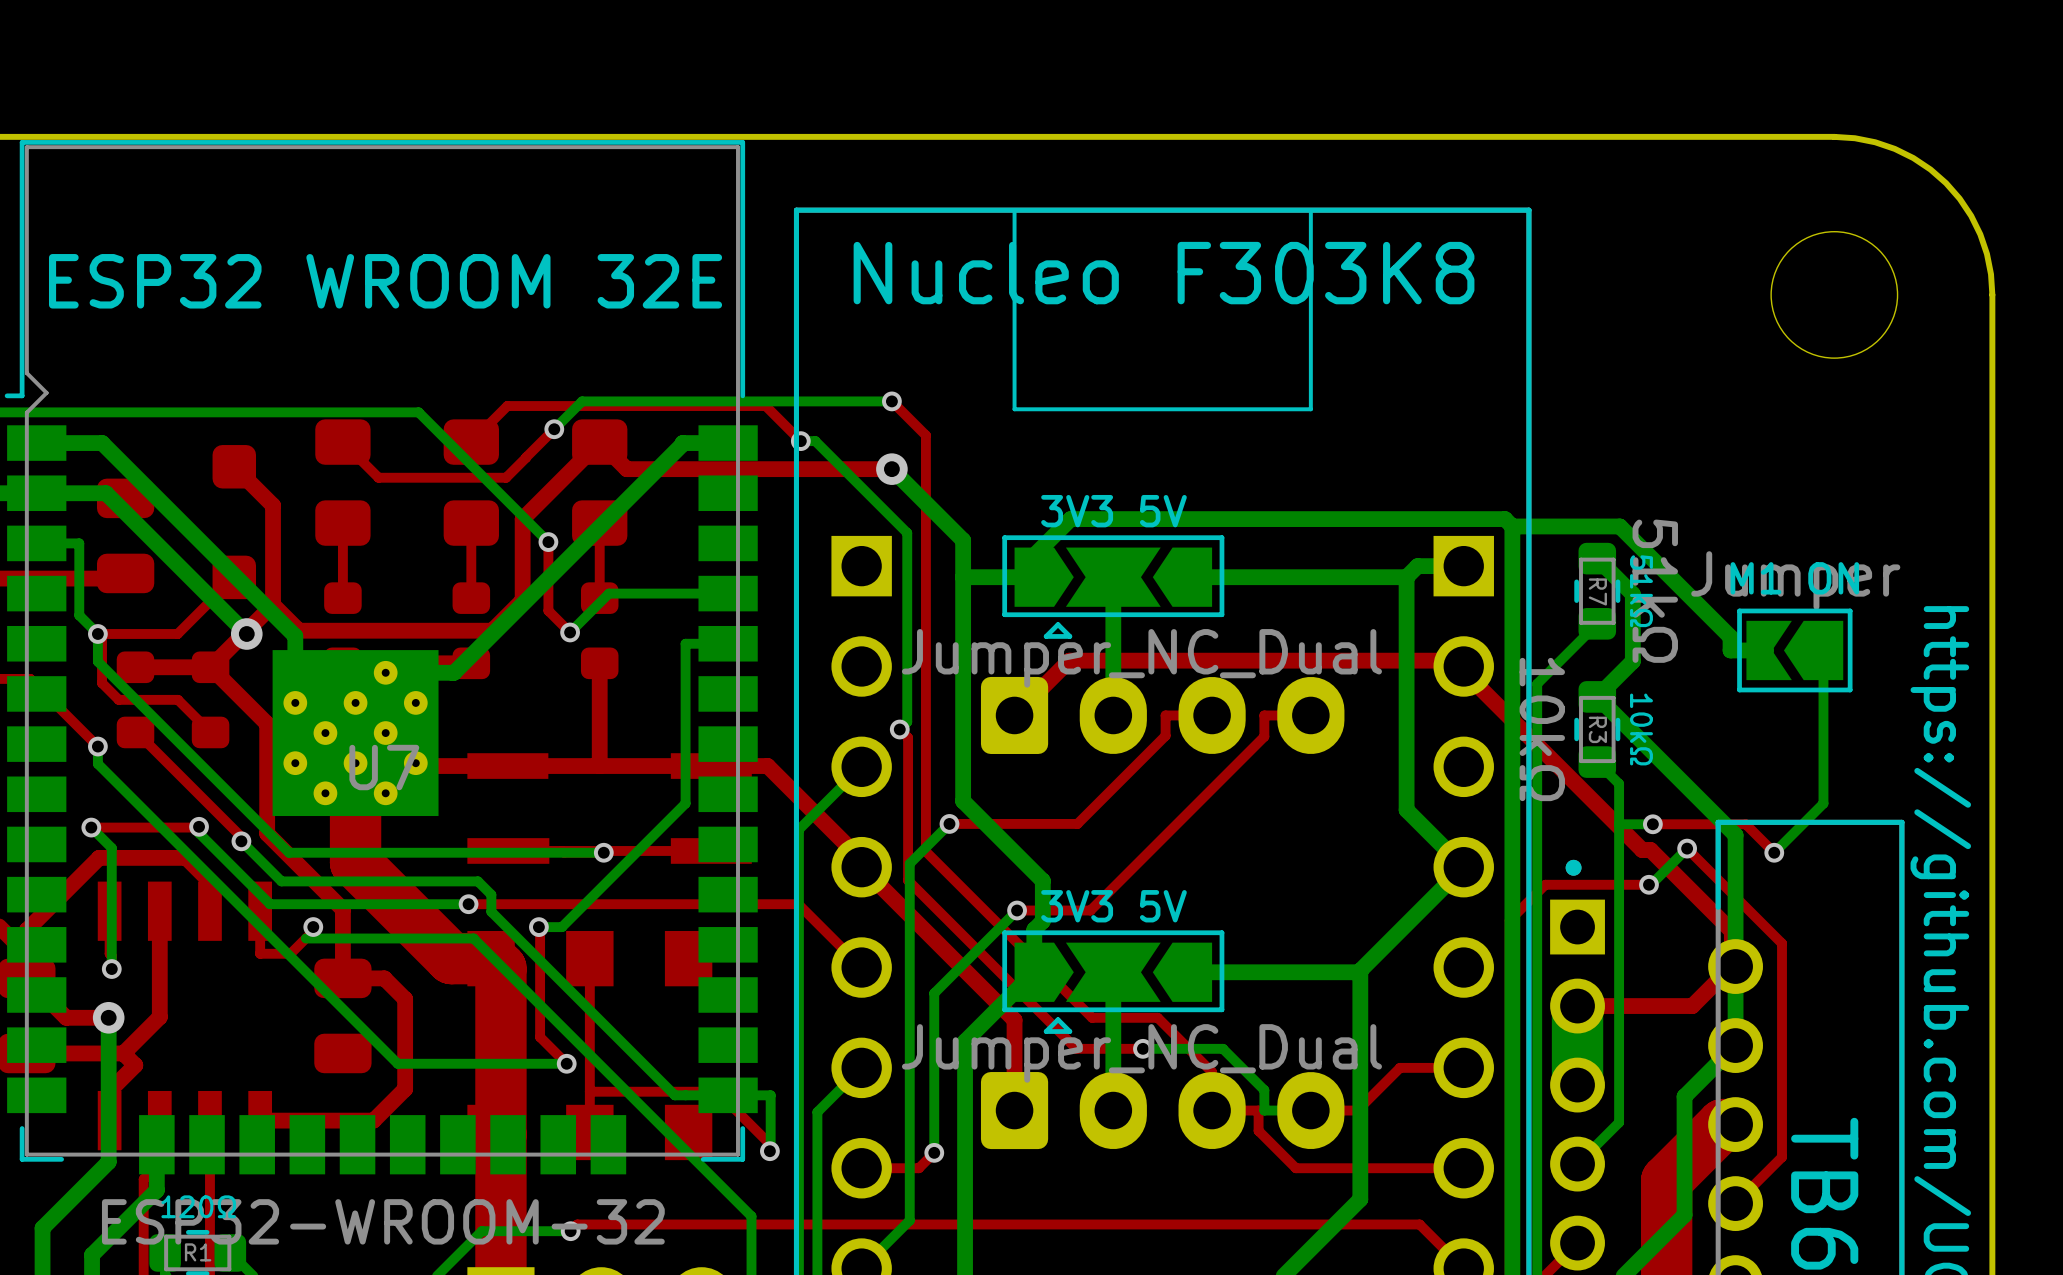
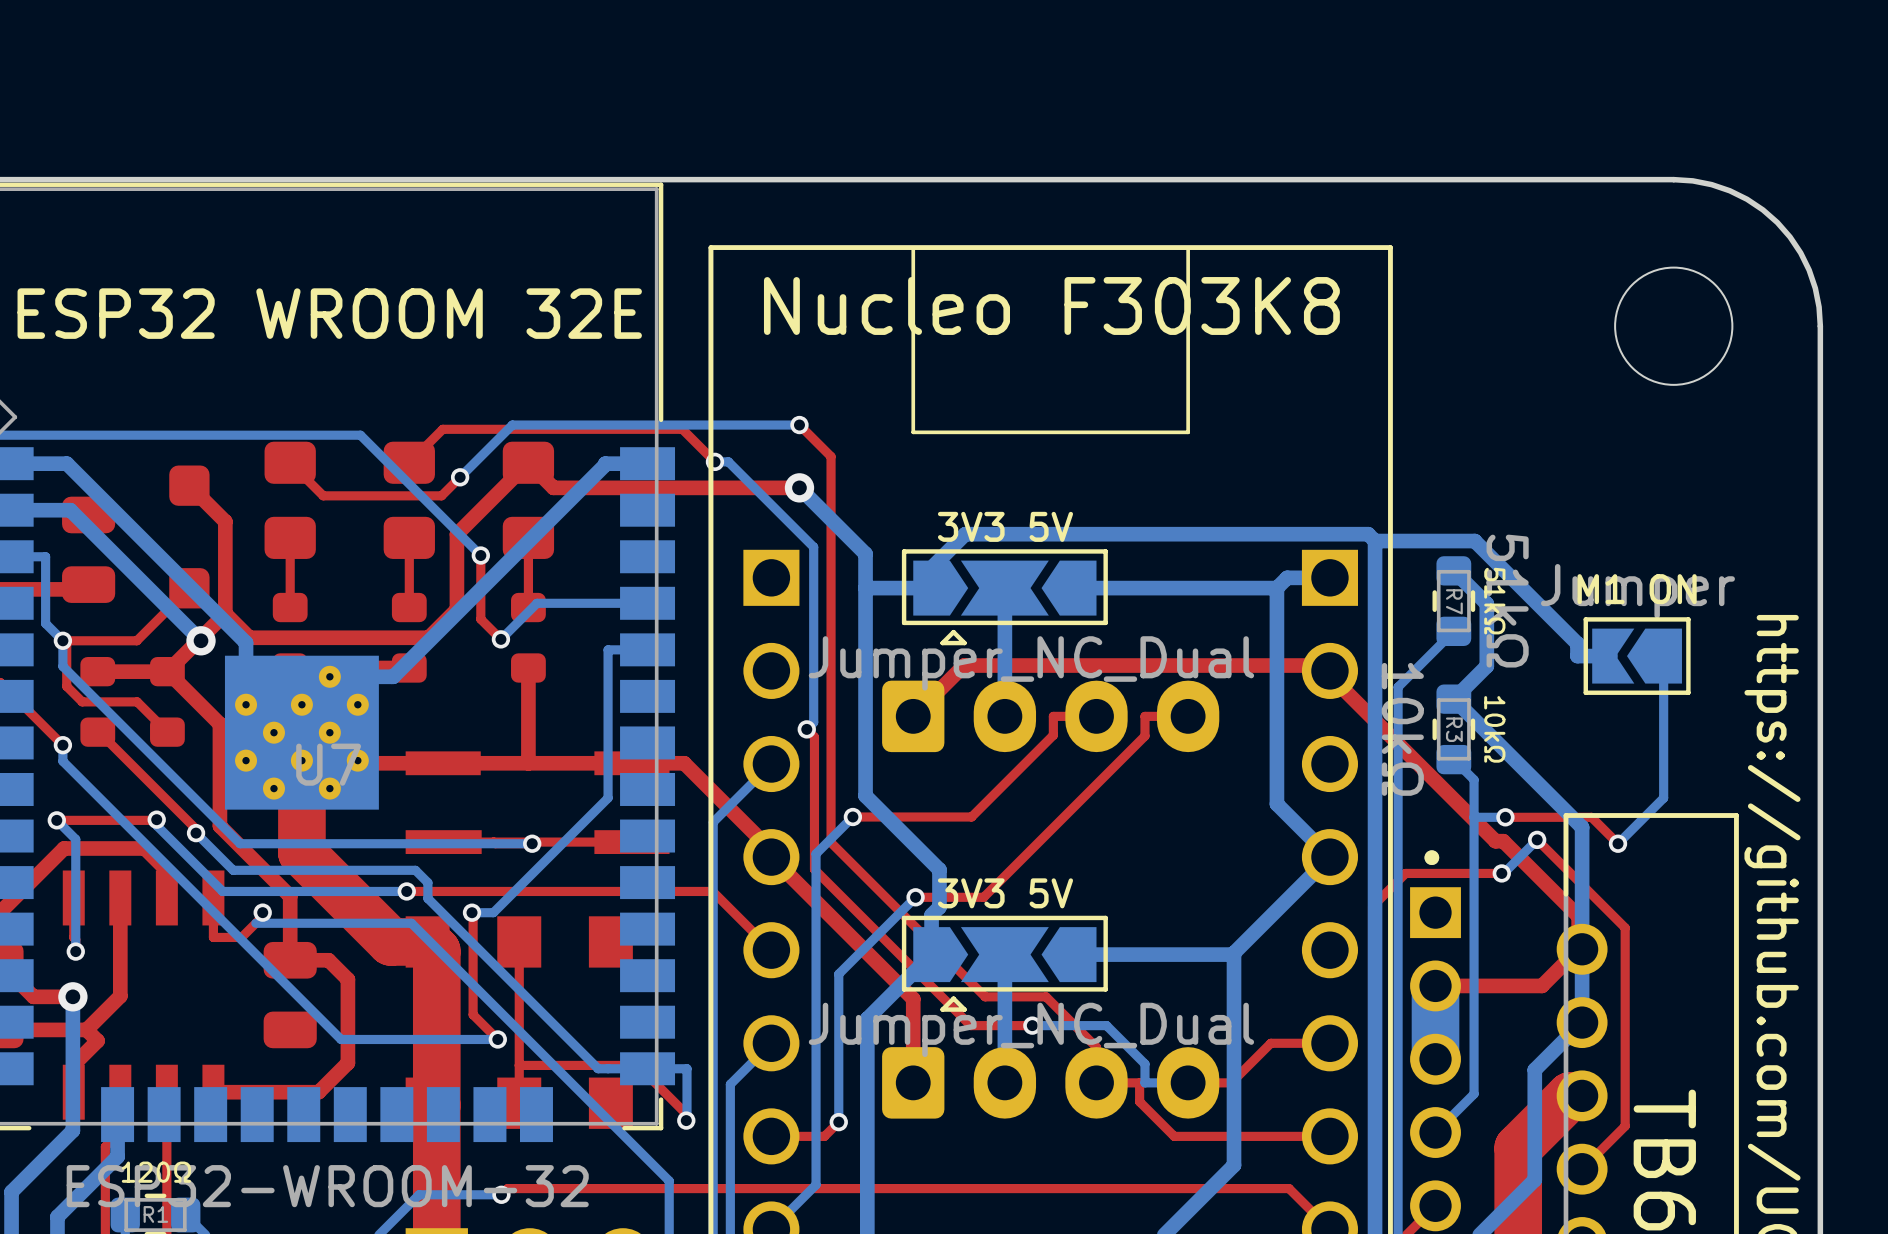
bottom track: (582, 401) (554, 429) -> (512, 425) (460, 477)
top track: (554, 429) (526, 457) -> none
via position: (554, 429) -> (460, 477)

